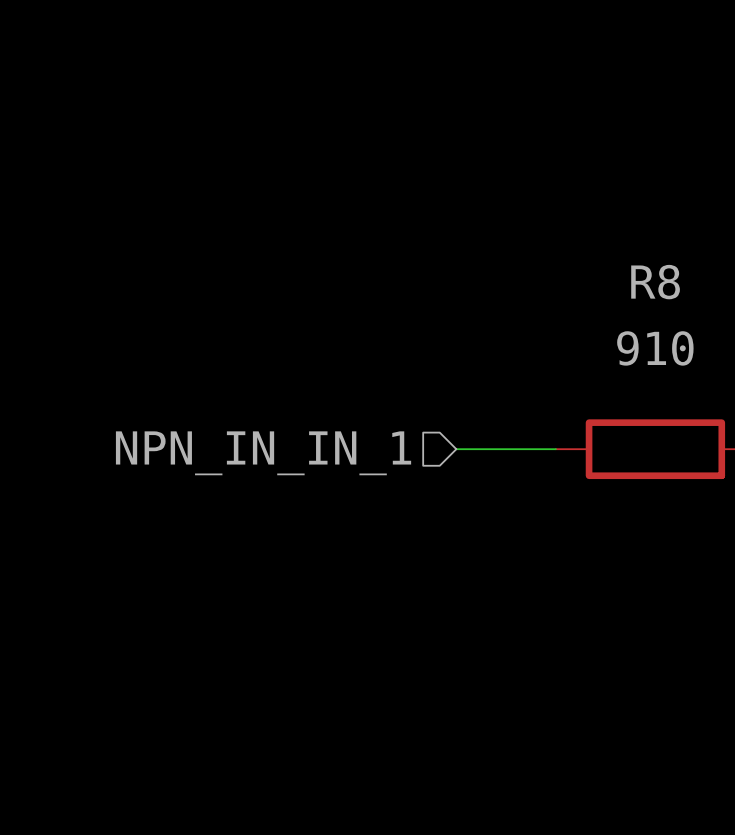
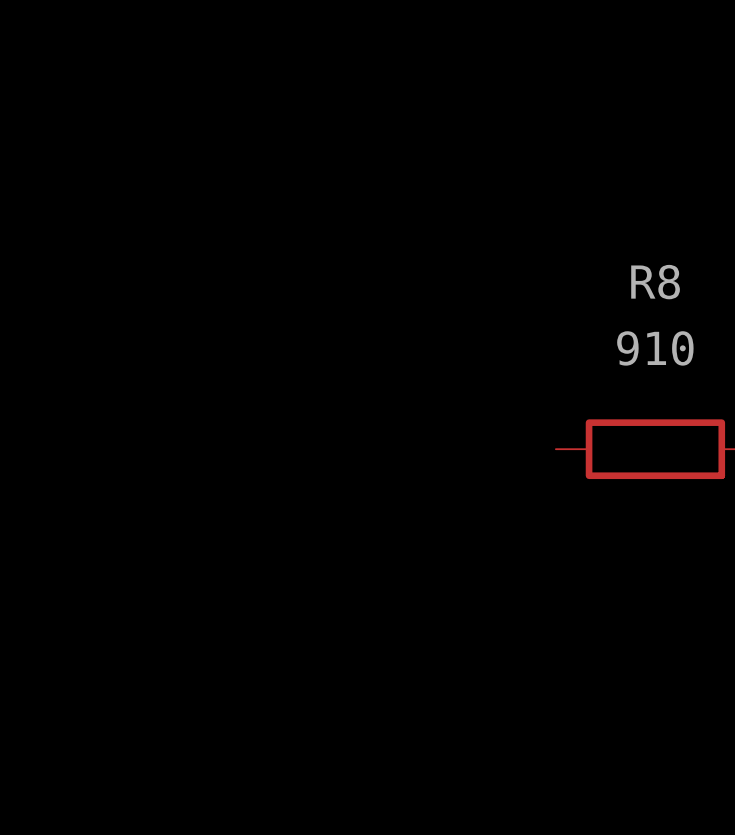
wire: (456, 449) (555, 449) -> none
hierarchical label: NPN_IN_IN_1 (263, 453) -> none

